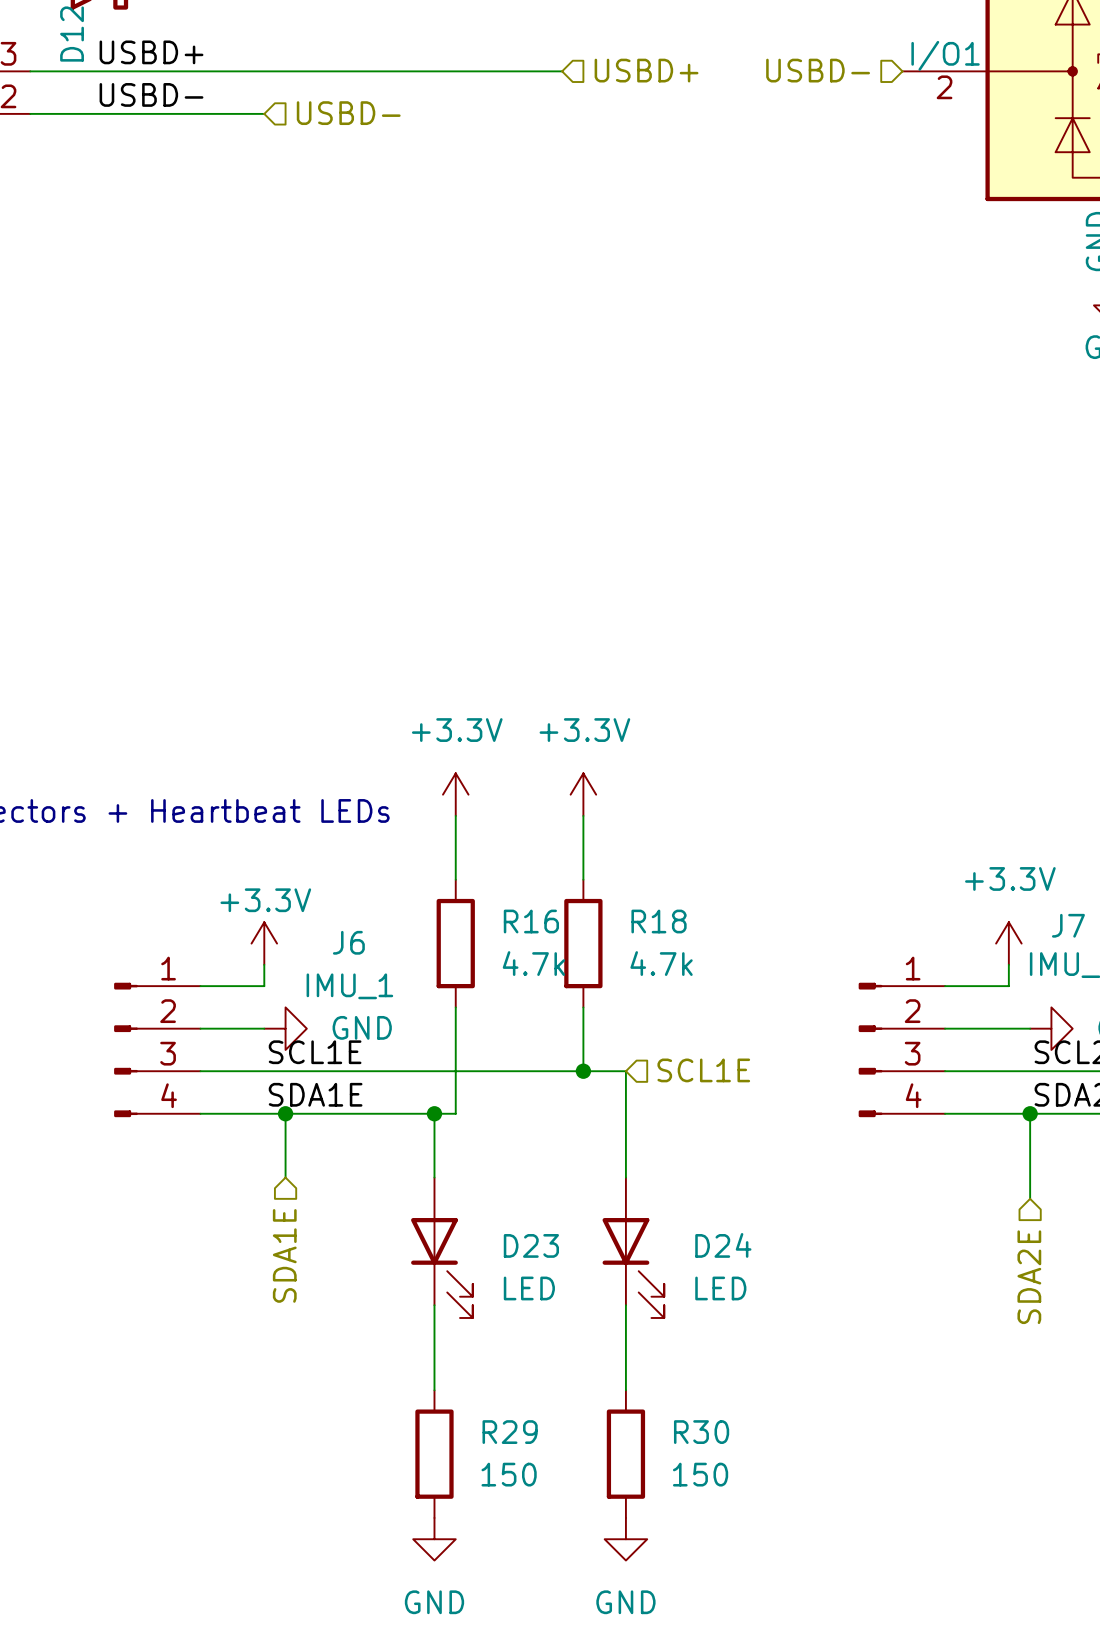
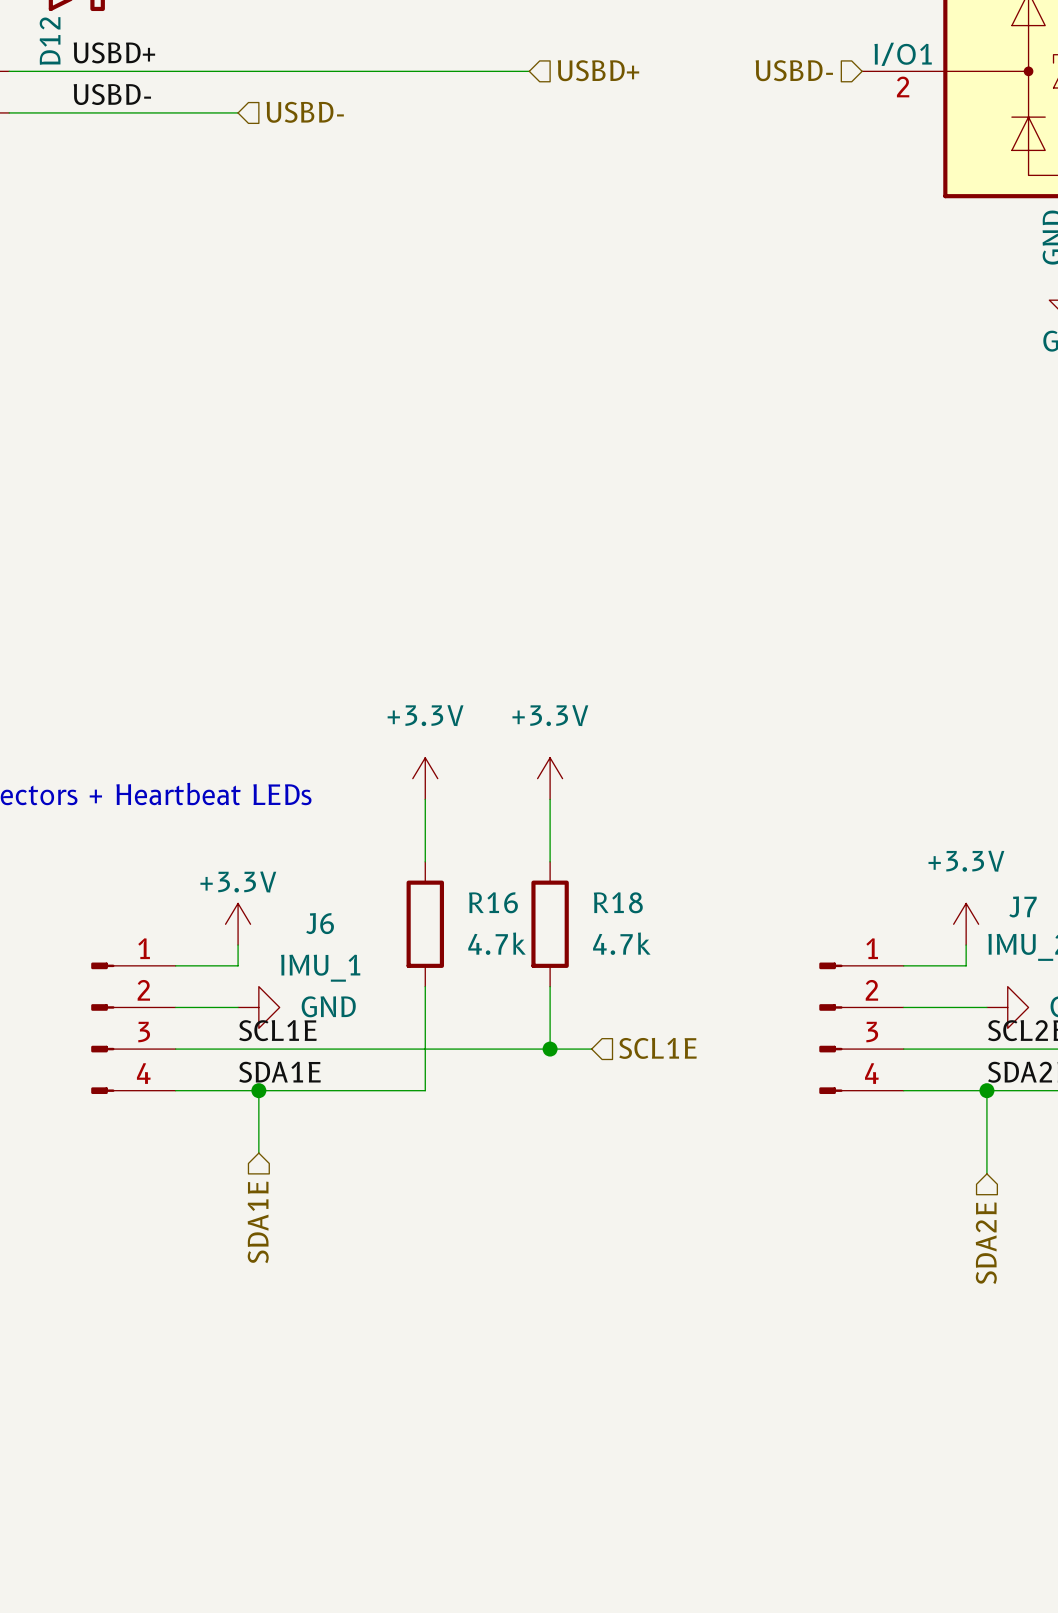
wire: (625, 1071) (625, 1177) -> none
wire: (434, 1113) (434, 1177) -> none
junction: (434, 1113) -> none
D23: LED (441, 1247) -> none
D24: LED (633, 1247) -> none
wire: (434, 1305) (434, 1390) -> none
wire: (625, 1305) (625, 1390) -> none
R29: 150 (434, 1454) -> none
R30: 150 (625, 1454) -> none
power symbol: GND (434, 1539) -> none
power symbol: GND (625, 1539) -> none

